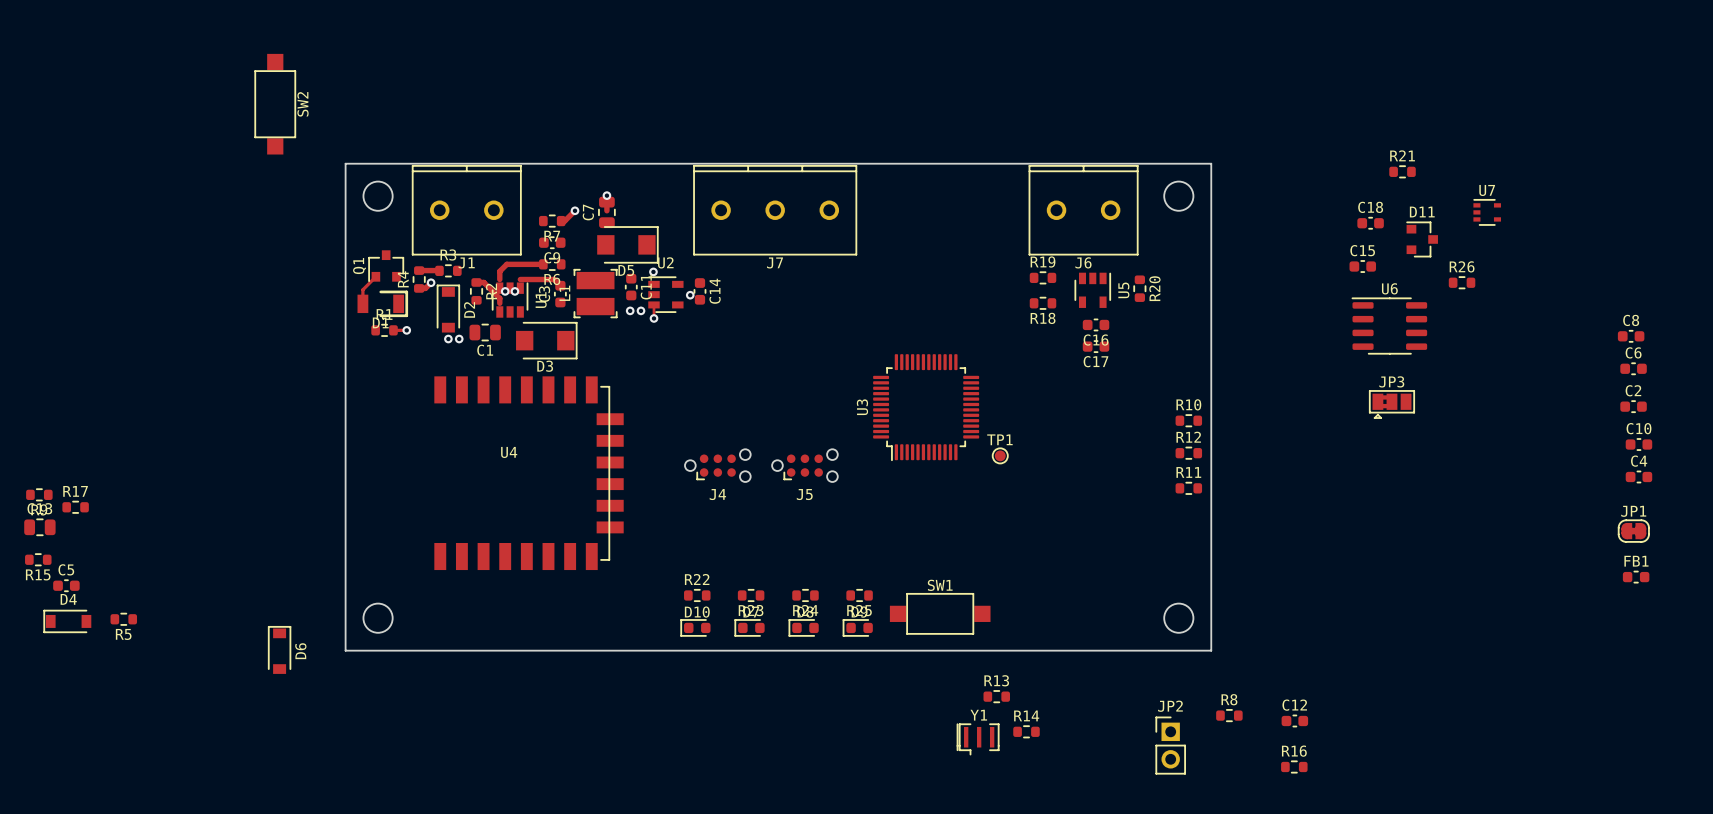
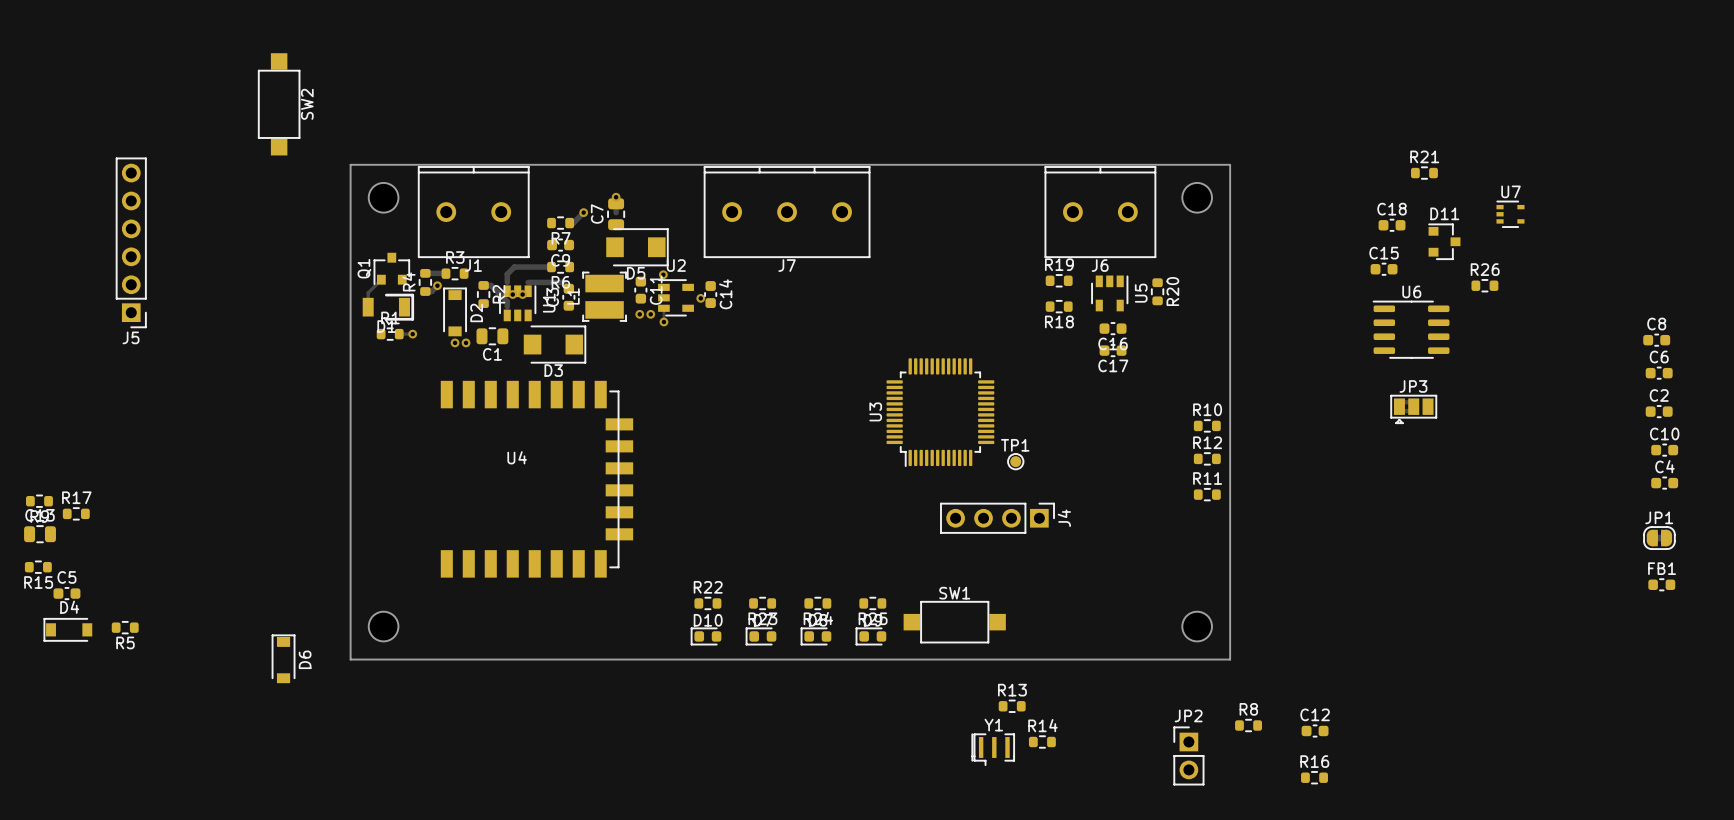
J4 footprint: [684, 449, 751, 482] -> [940, 502, 1055, 534]
J5 footprint: [772, 449, 838, 482] -> [115, 157, 147, 328]
J4 name position: J4 (717, 494) -> J4 (1064, 518)
J5 name position: J5 (804, 494) -> J5 (131, 337)

